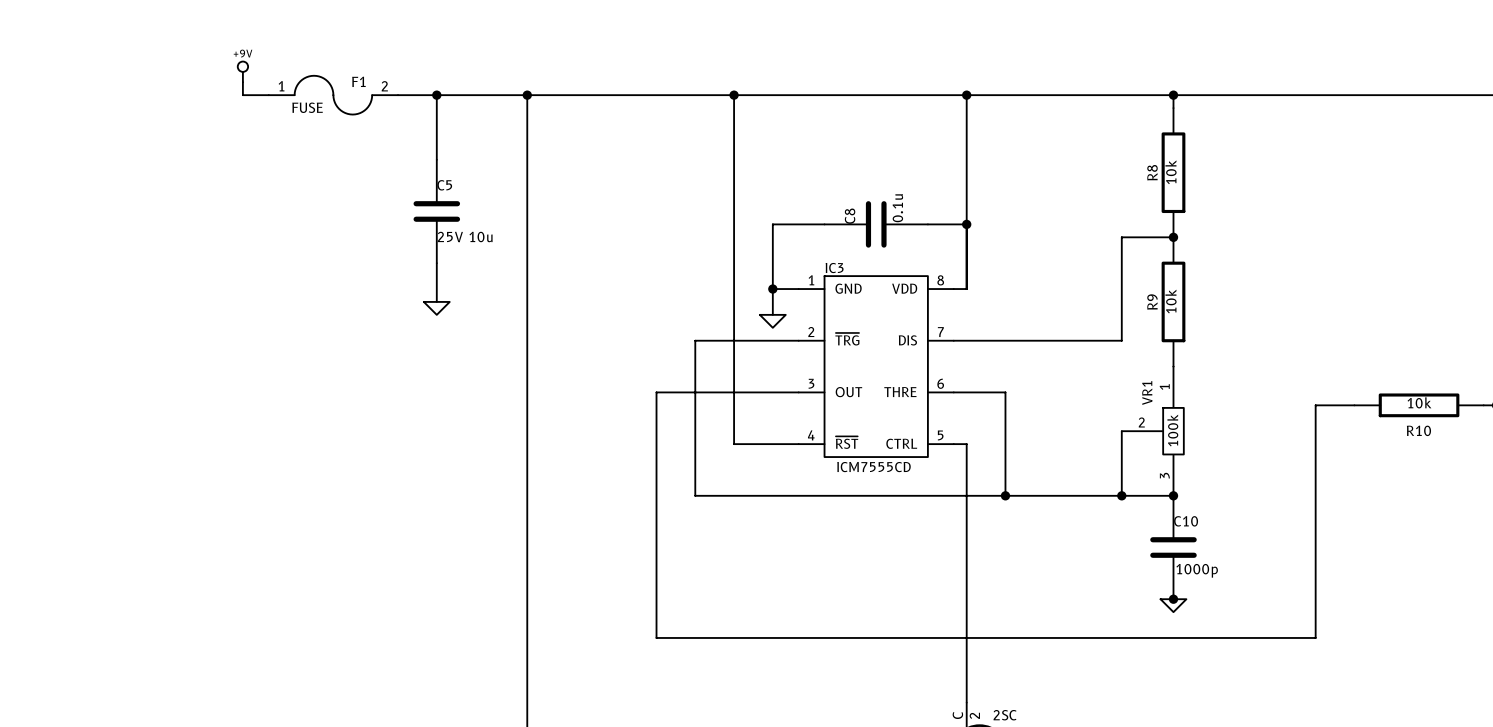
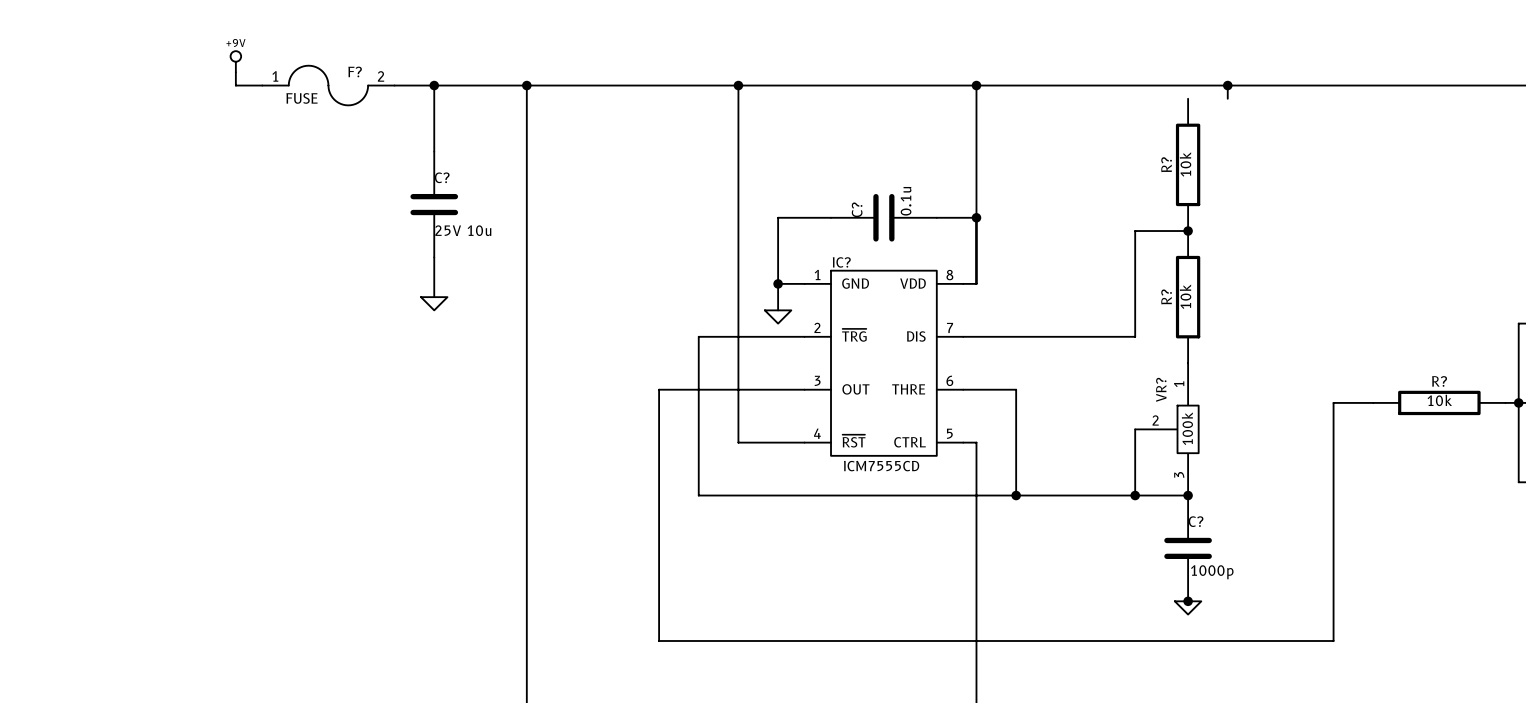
F1 name: F1 (358, 81) -> F? (355, 71)
wire: (1173, 95) (1173, 108) -> (1227, 85) (1227, 98)
junction position: (1173, 95) -> (1227, 85)
R8 name: R8 (1152, 172) -> R? (1166, 164)
C5 name: C5 (444, 185) -> C? (442, 177)
C8 name: C8 (850, 216) -> C? (857, 209)
IC3 name: IC3 (834, 268) -> IC? (841, 262)
R9 name: R9 (1152, 302) -> R? (1166, 296)
VR1 name: VR1 (1147, 393) -> VR? (1161, 389)
R10 name: R10 (1418, 430) -> R? (1439, 381)
C10 name: C10 (1186, 521) -> C? (1196, 521)

